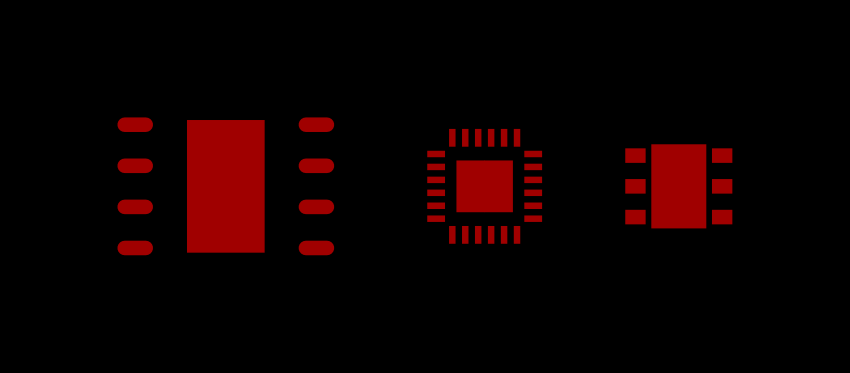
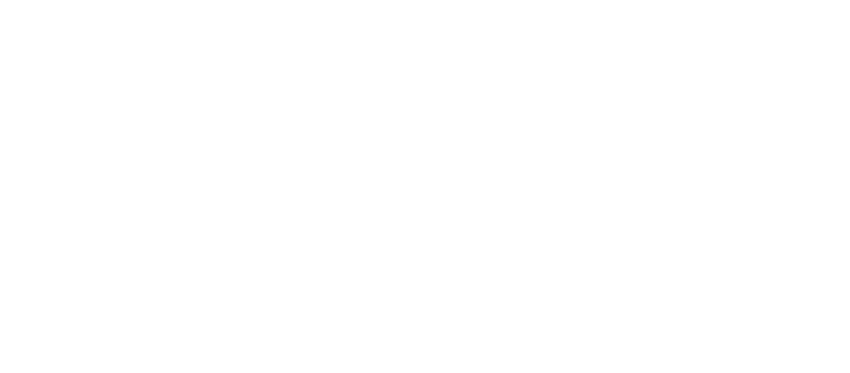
part: (225, 186) -> none
part: (484, 186) -> none
part: (678, 186) -> none

